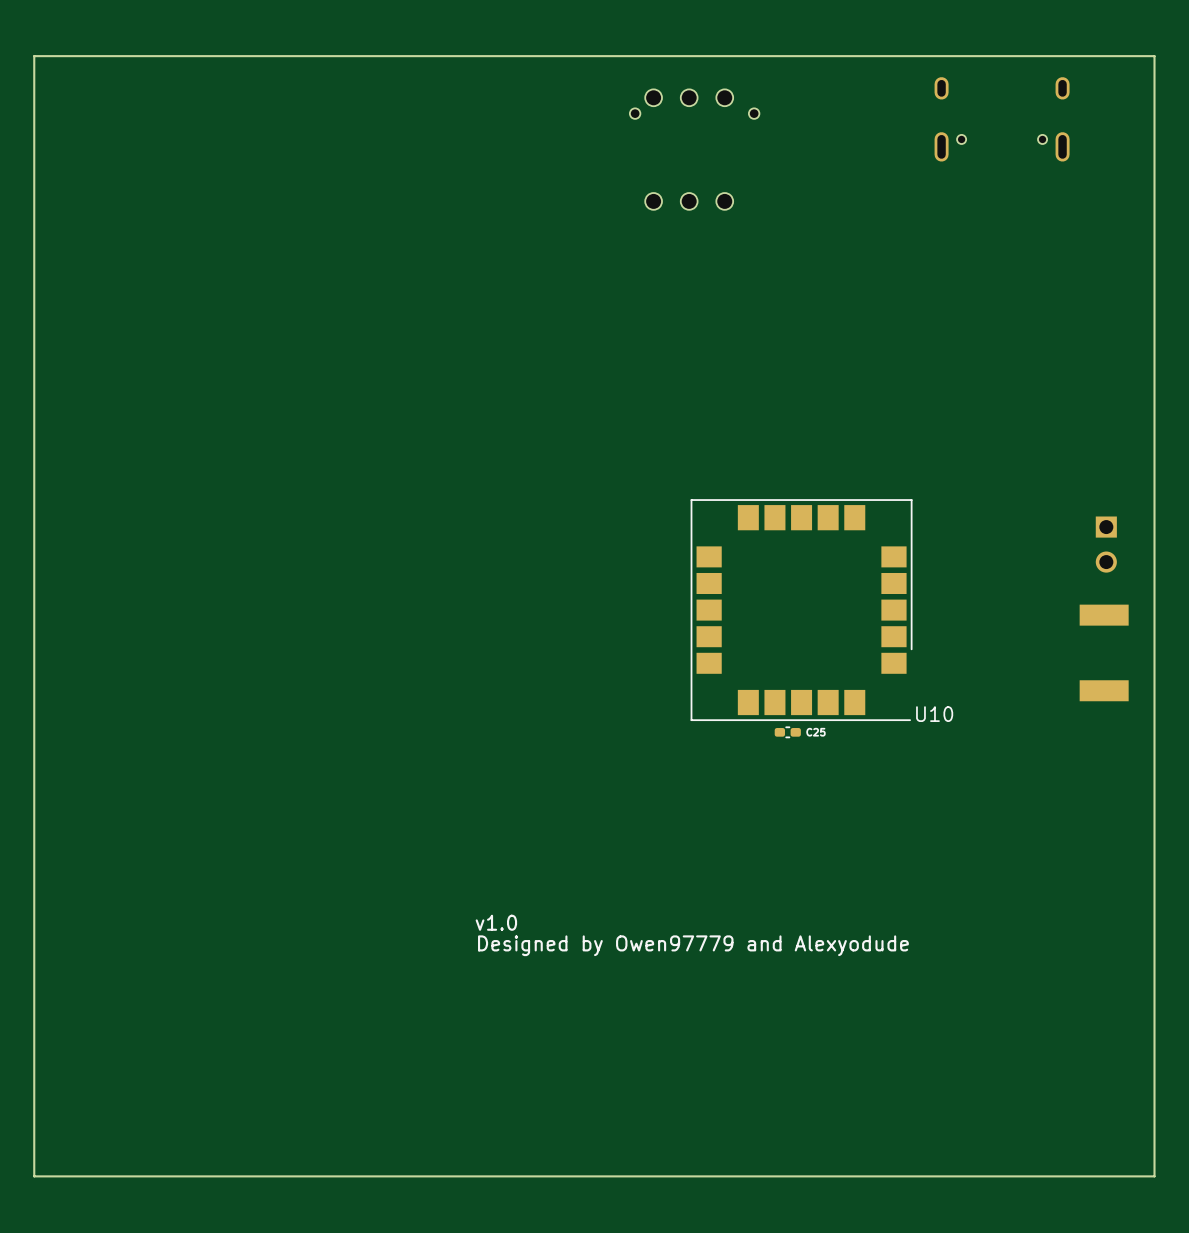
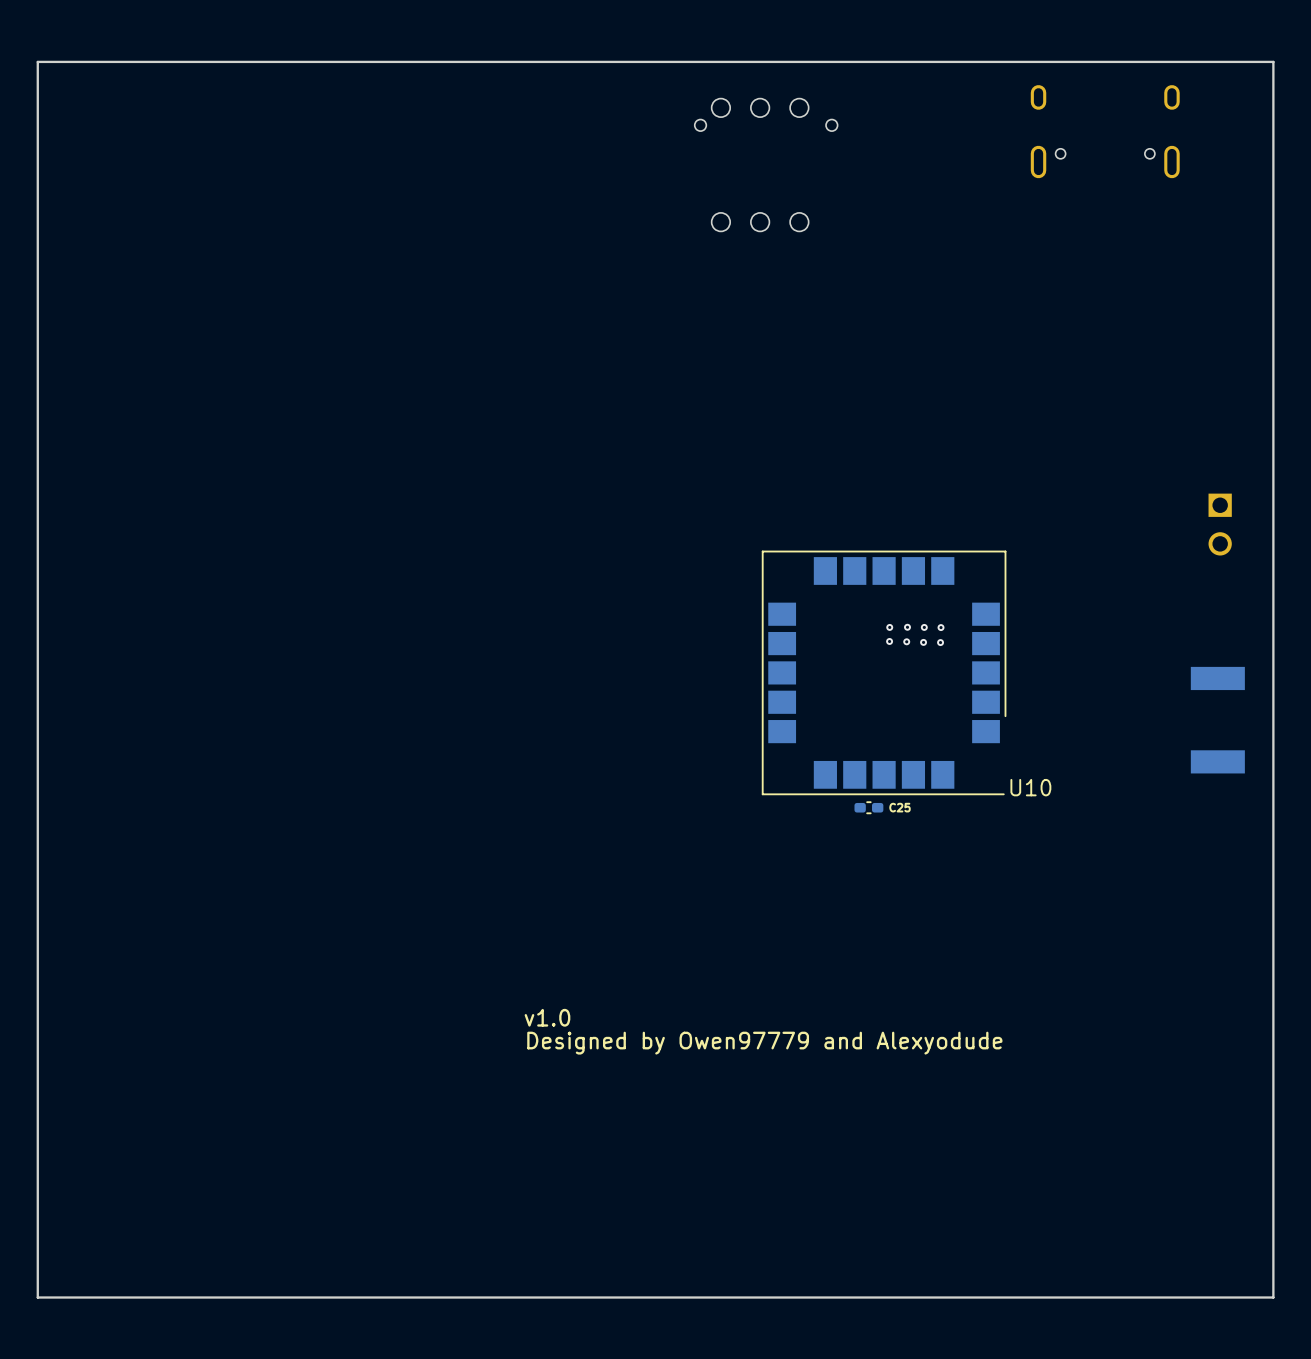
part position: (1106, 544) -> (1220, 524)
via: none -> (889, 627)
via: none -> (907, 627)
via: none -> (924, 627)
via: none -> (941, 627)
via: none -> (889, 641)
via: none -> (906, 641)
via: none -> (923, 642)
via: none -> (940, 642)

